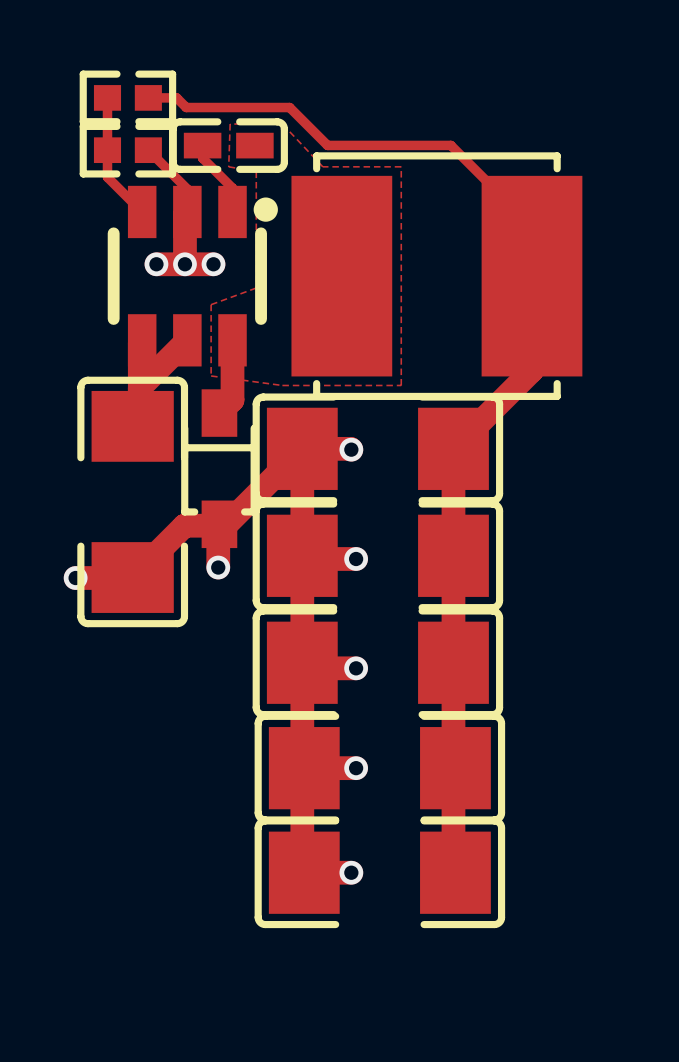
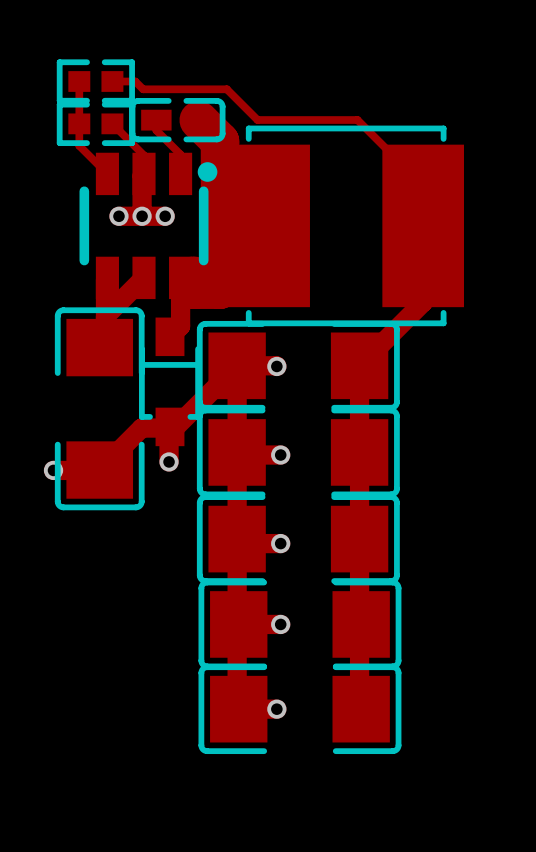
zone outline: (230, 124) (282, 124) (322, 166) (401, 166) (401, 385) (282, 385) (211, 375) (211, 304) (256, 288) (256, 171) (228, 166) (230, 124) -> none
track: none -> (198, 120) (220, 141) (220, 289) (194, 289) (193, 275)

